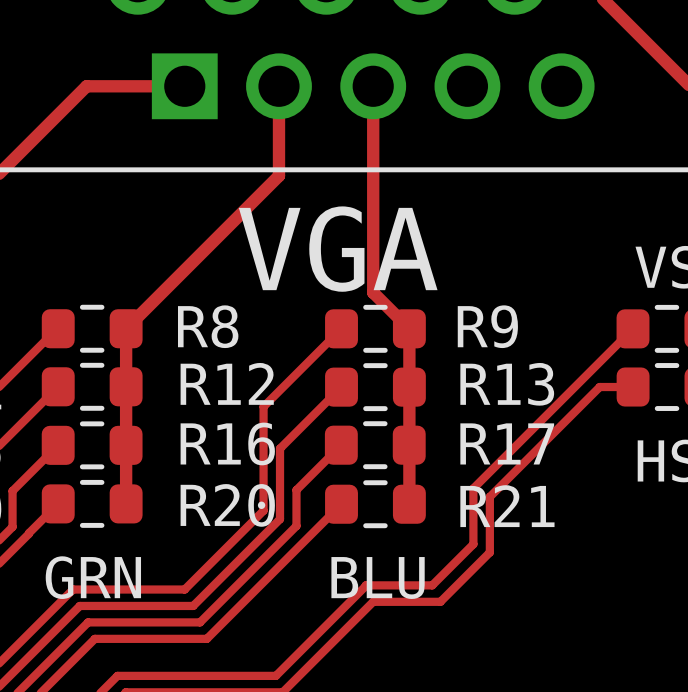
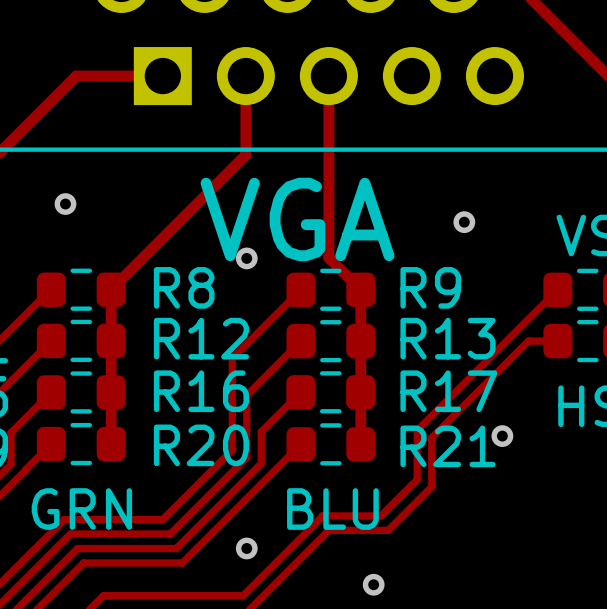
via: none -> (65, 204)
via: none -> (464, 222)
via: none -> (246, 258)
via: none -> (502, 436)
via: none -> (246, 548)
via: none -> (373, 584)

